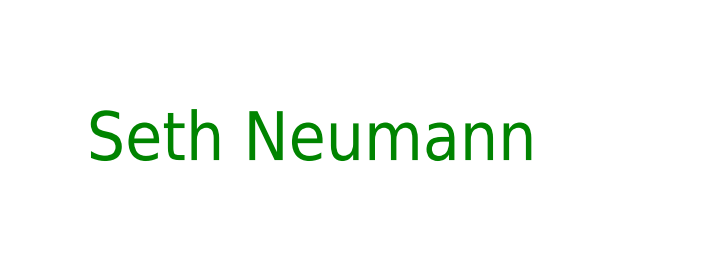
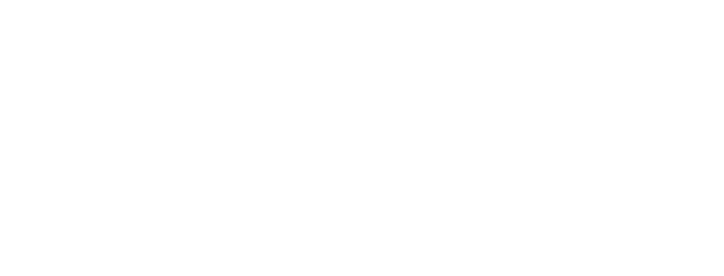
text: Seth Neumann (311, 135) -> none

